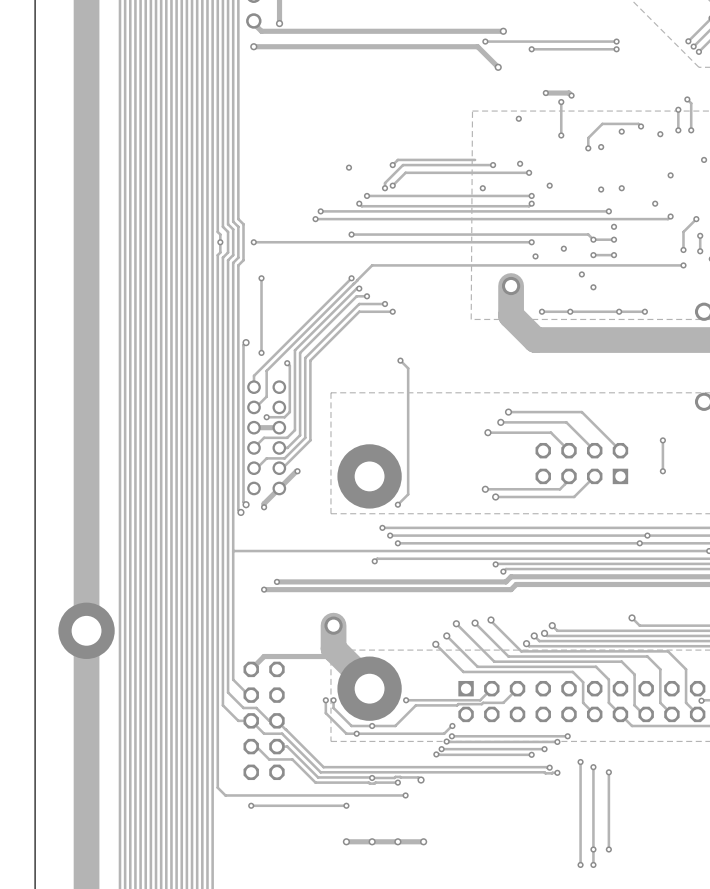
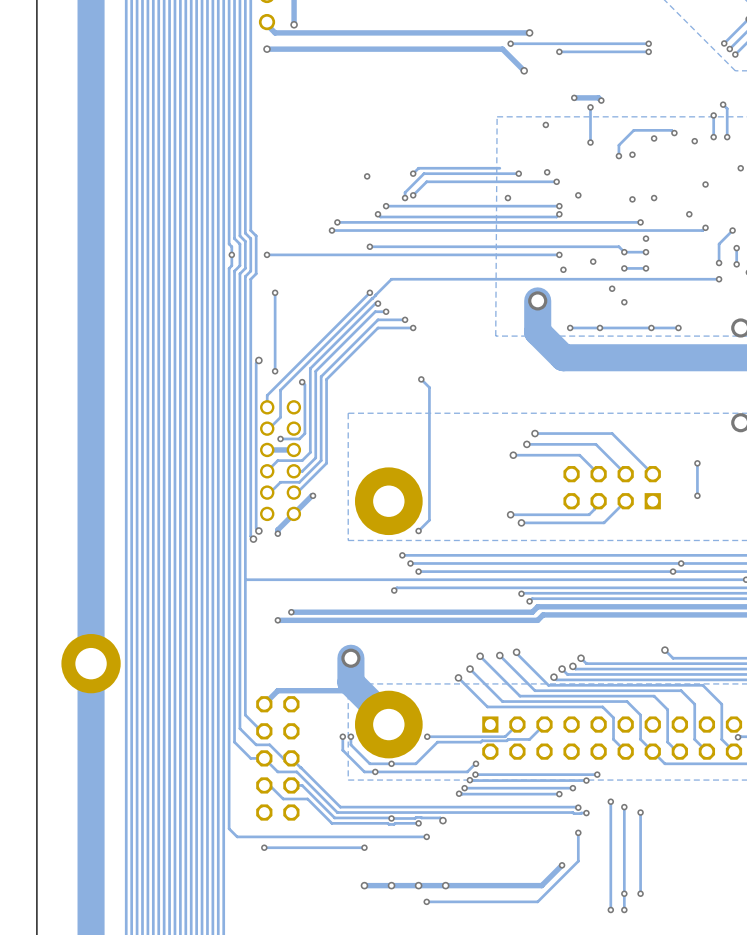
track: none -> (578, 832) (578, 861) (537, 901) (426, 901)
via: none -> (578, 832)
track: none -> (562, 865) (541, 885) (445, 885)
via: none -> (562, 865)
via: none -> (426, 901)

